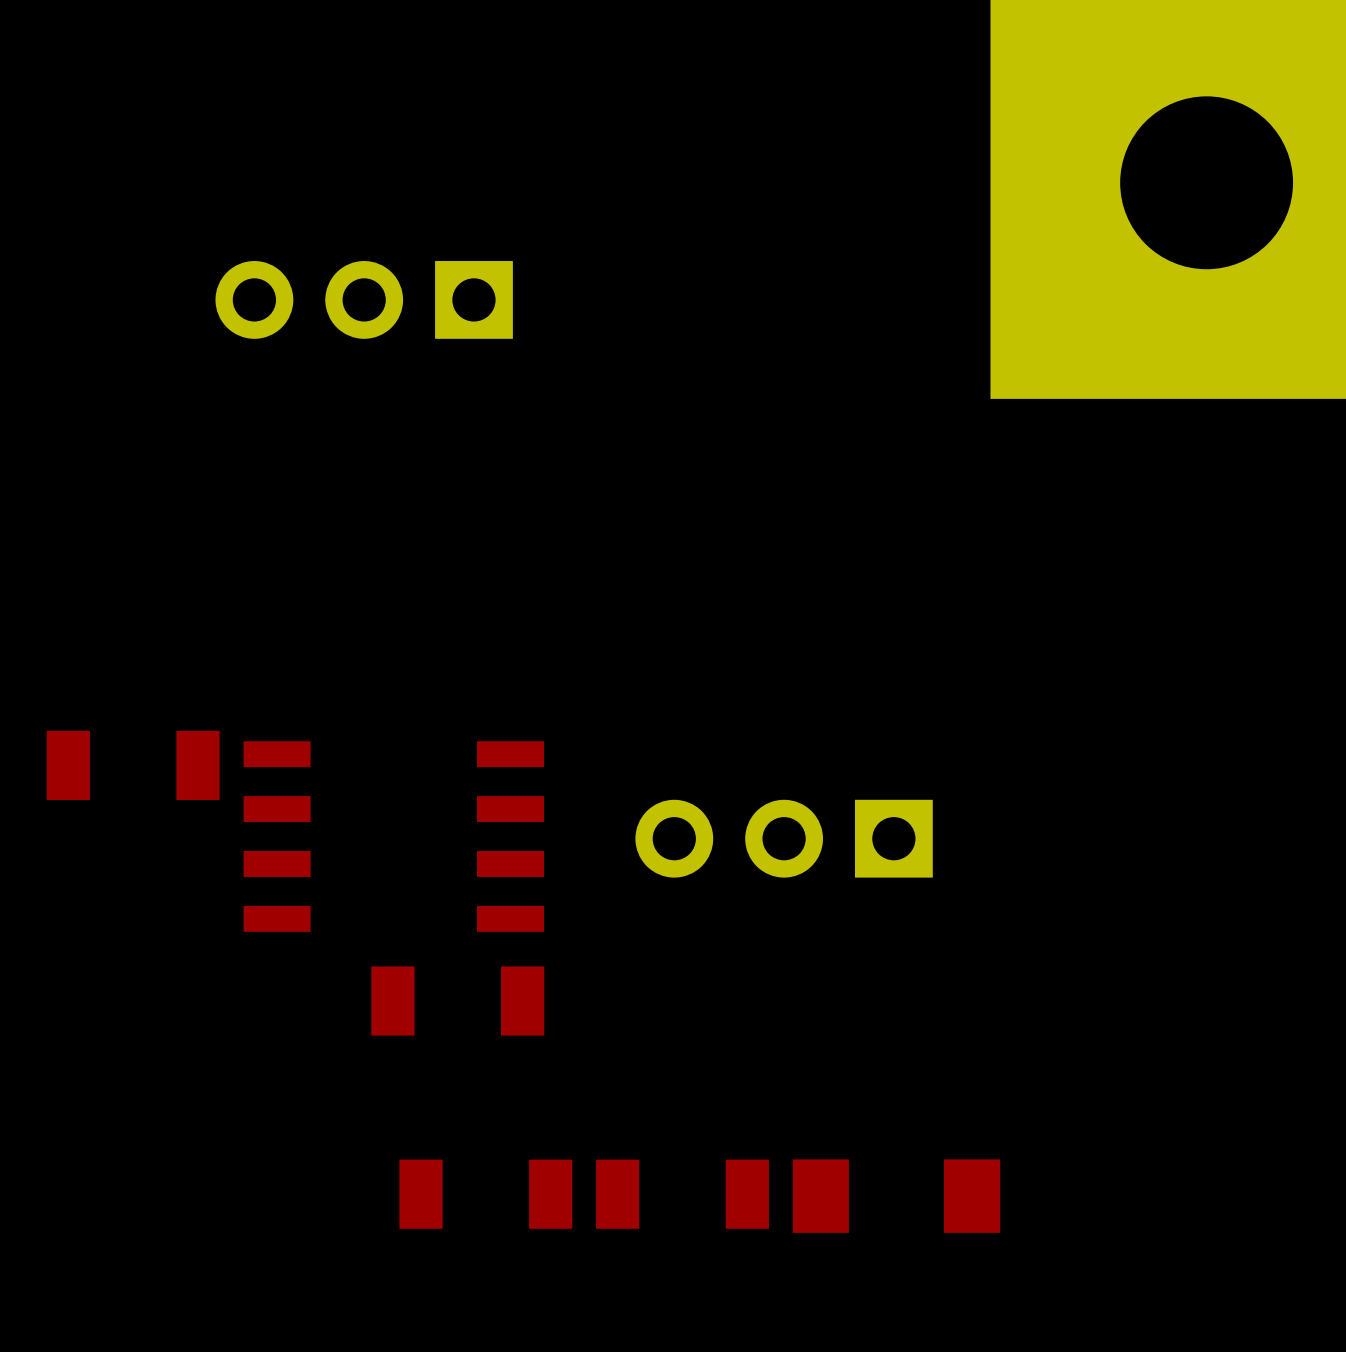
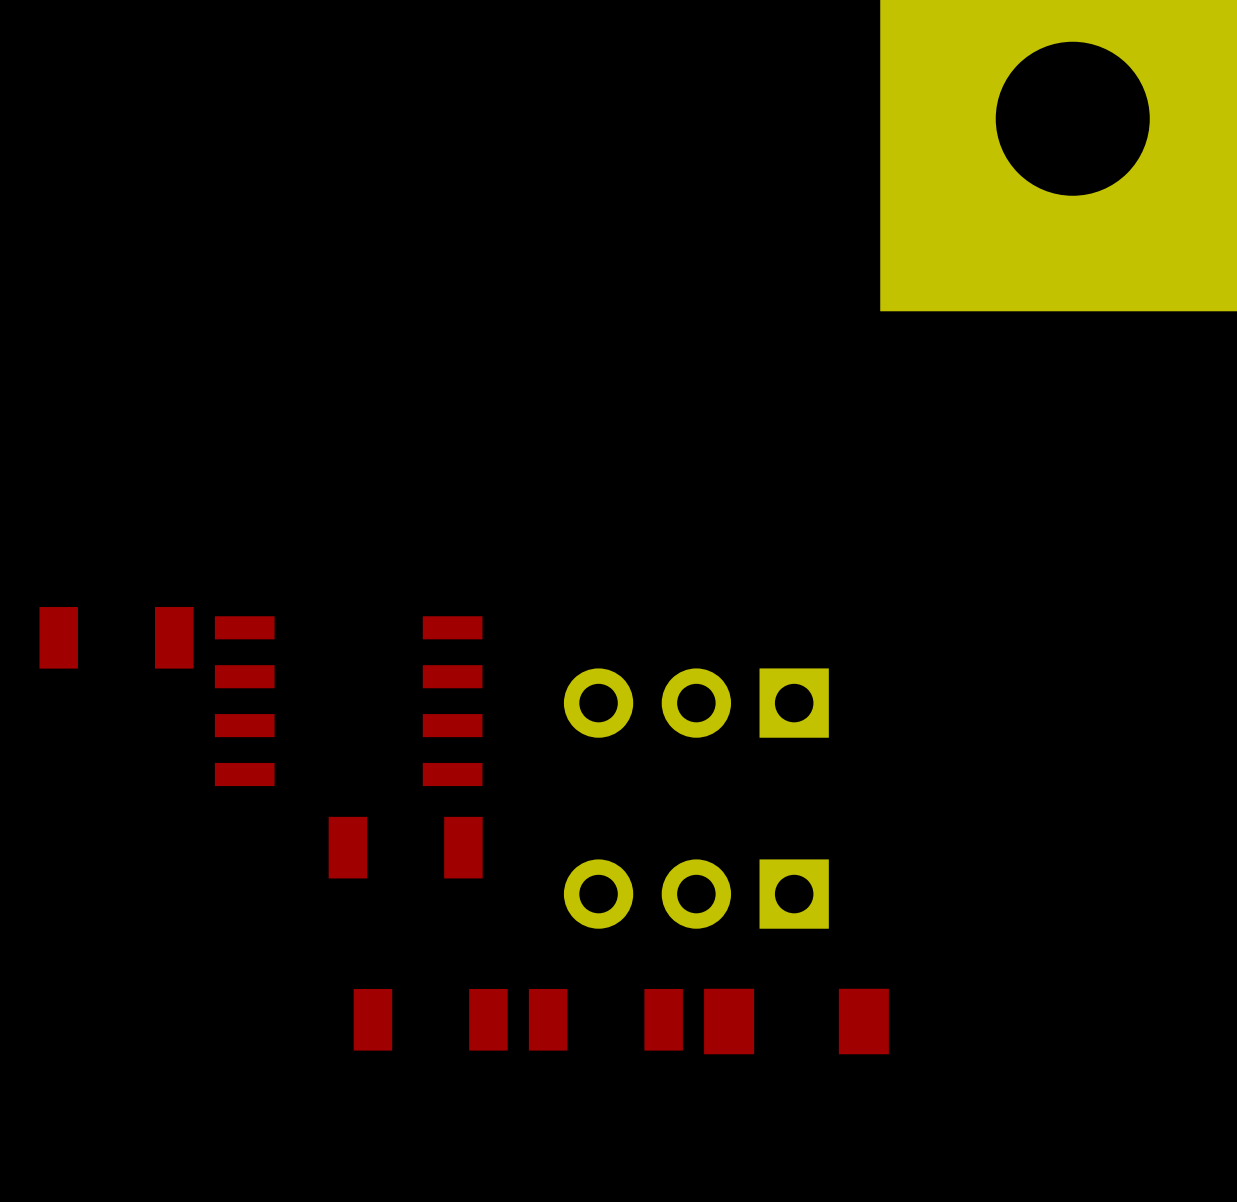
part position: (364, 299) -> (696, 894)

